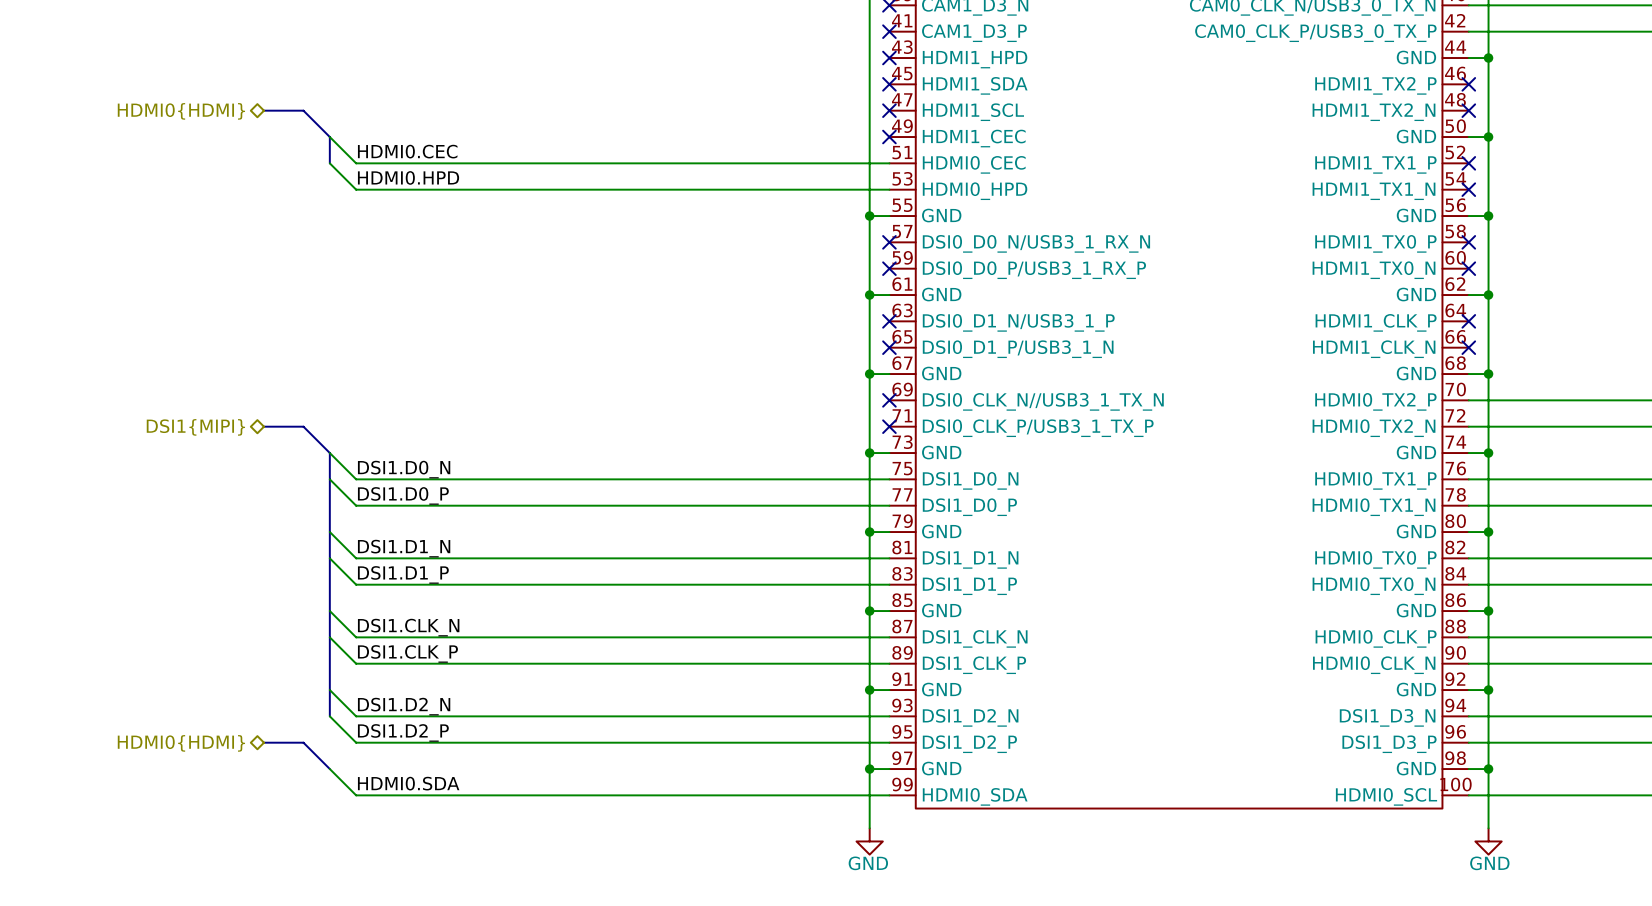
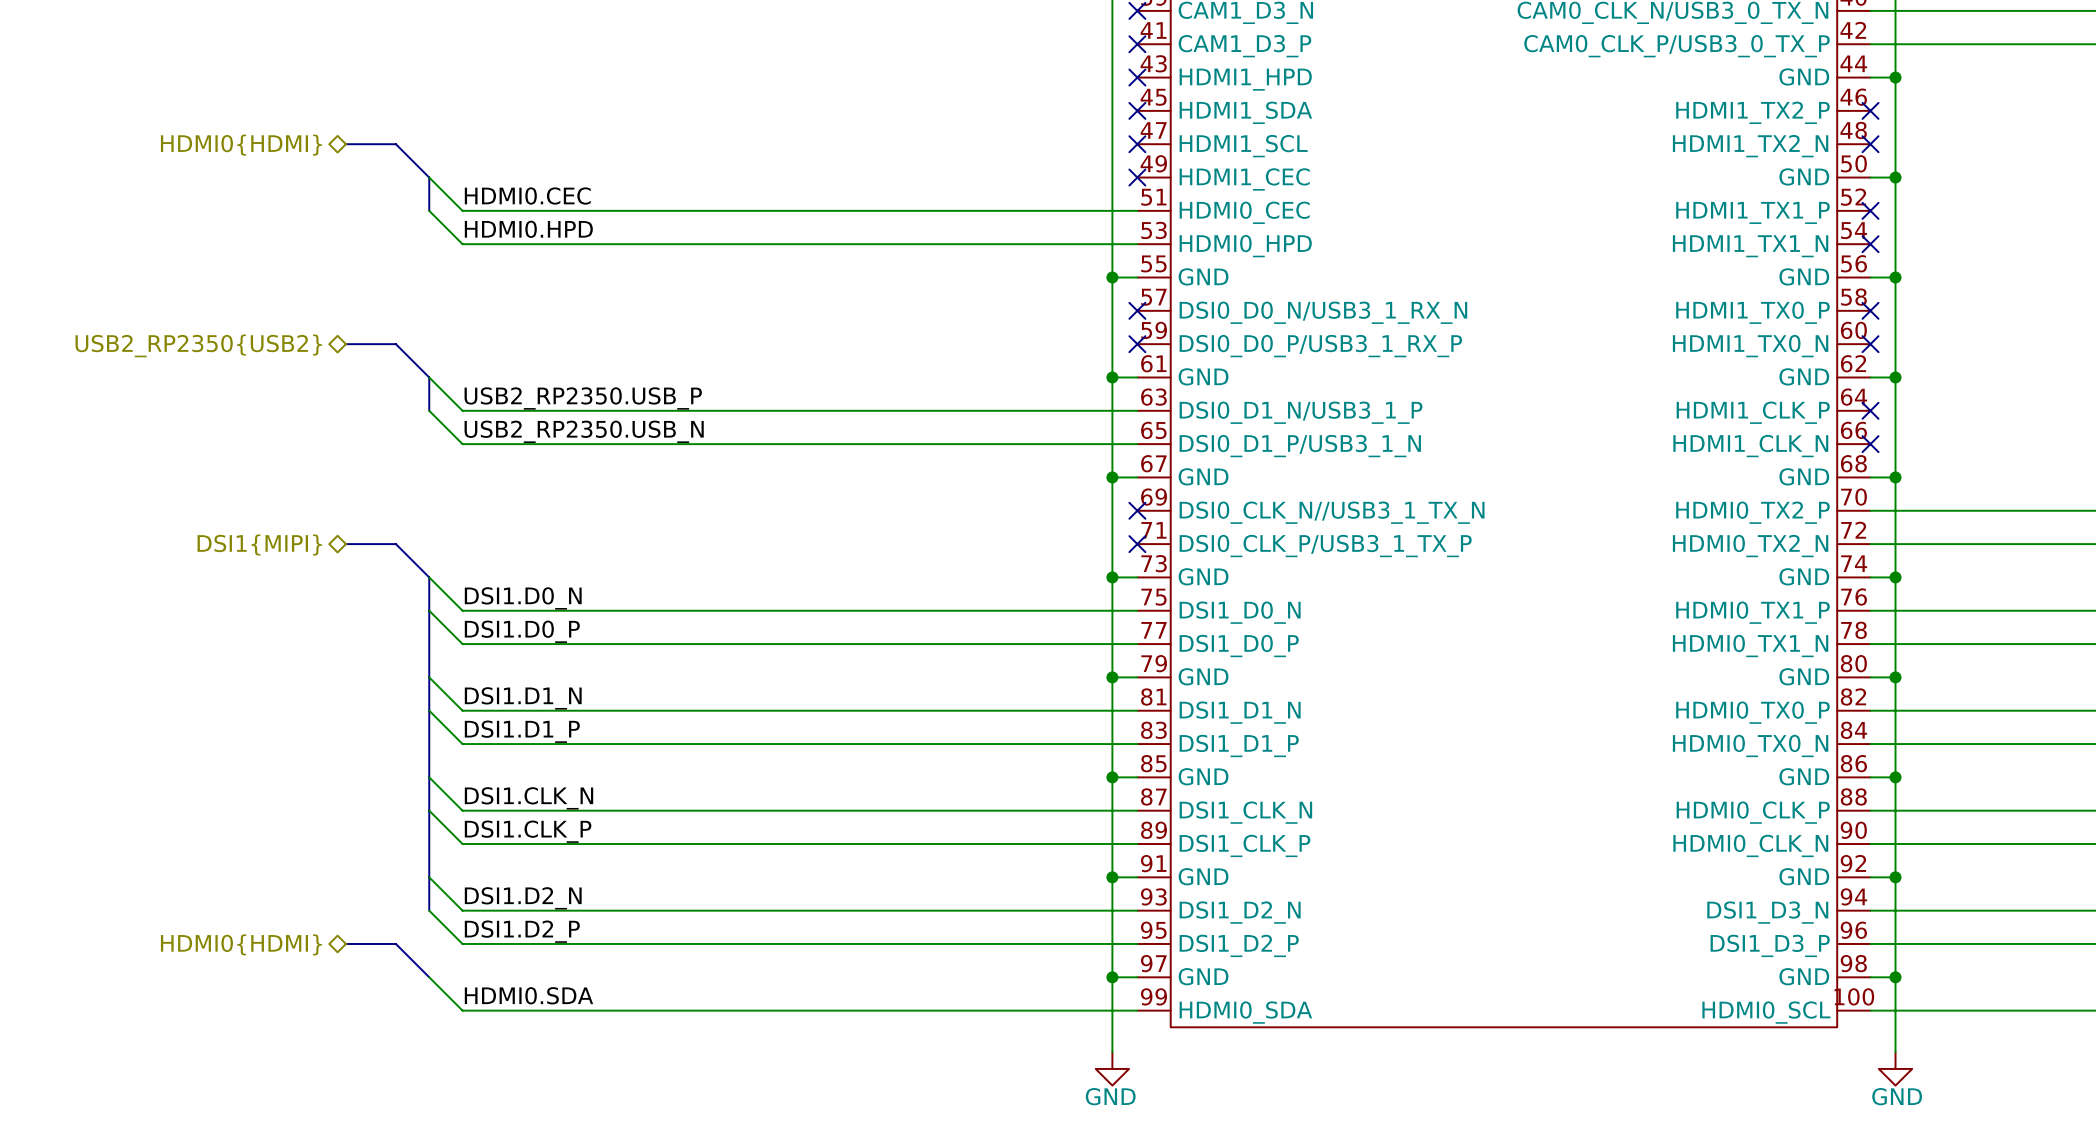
bus: none -> (345, 344) (395, 344) (429, 377) (429, 410)
hierarchical label: none -> USB2_RP2350{USB2} (198, 345)
wire: none -> (429, 377) (462, 410) (1137, 410)
label: none -> USB2_RP2350.USB_P (583, 398)
wire: none -> (429, 410) (462, 444) (1137, 444)
no-connect mark: (889, 321) -> none
label: none -> USB2_RP2350.USB_N (584, 431)
no-connect mark: (889, 347) -> none

